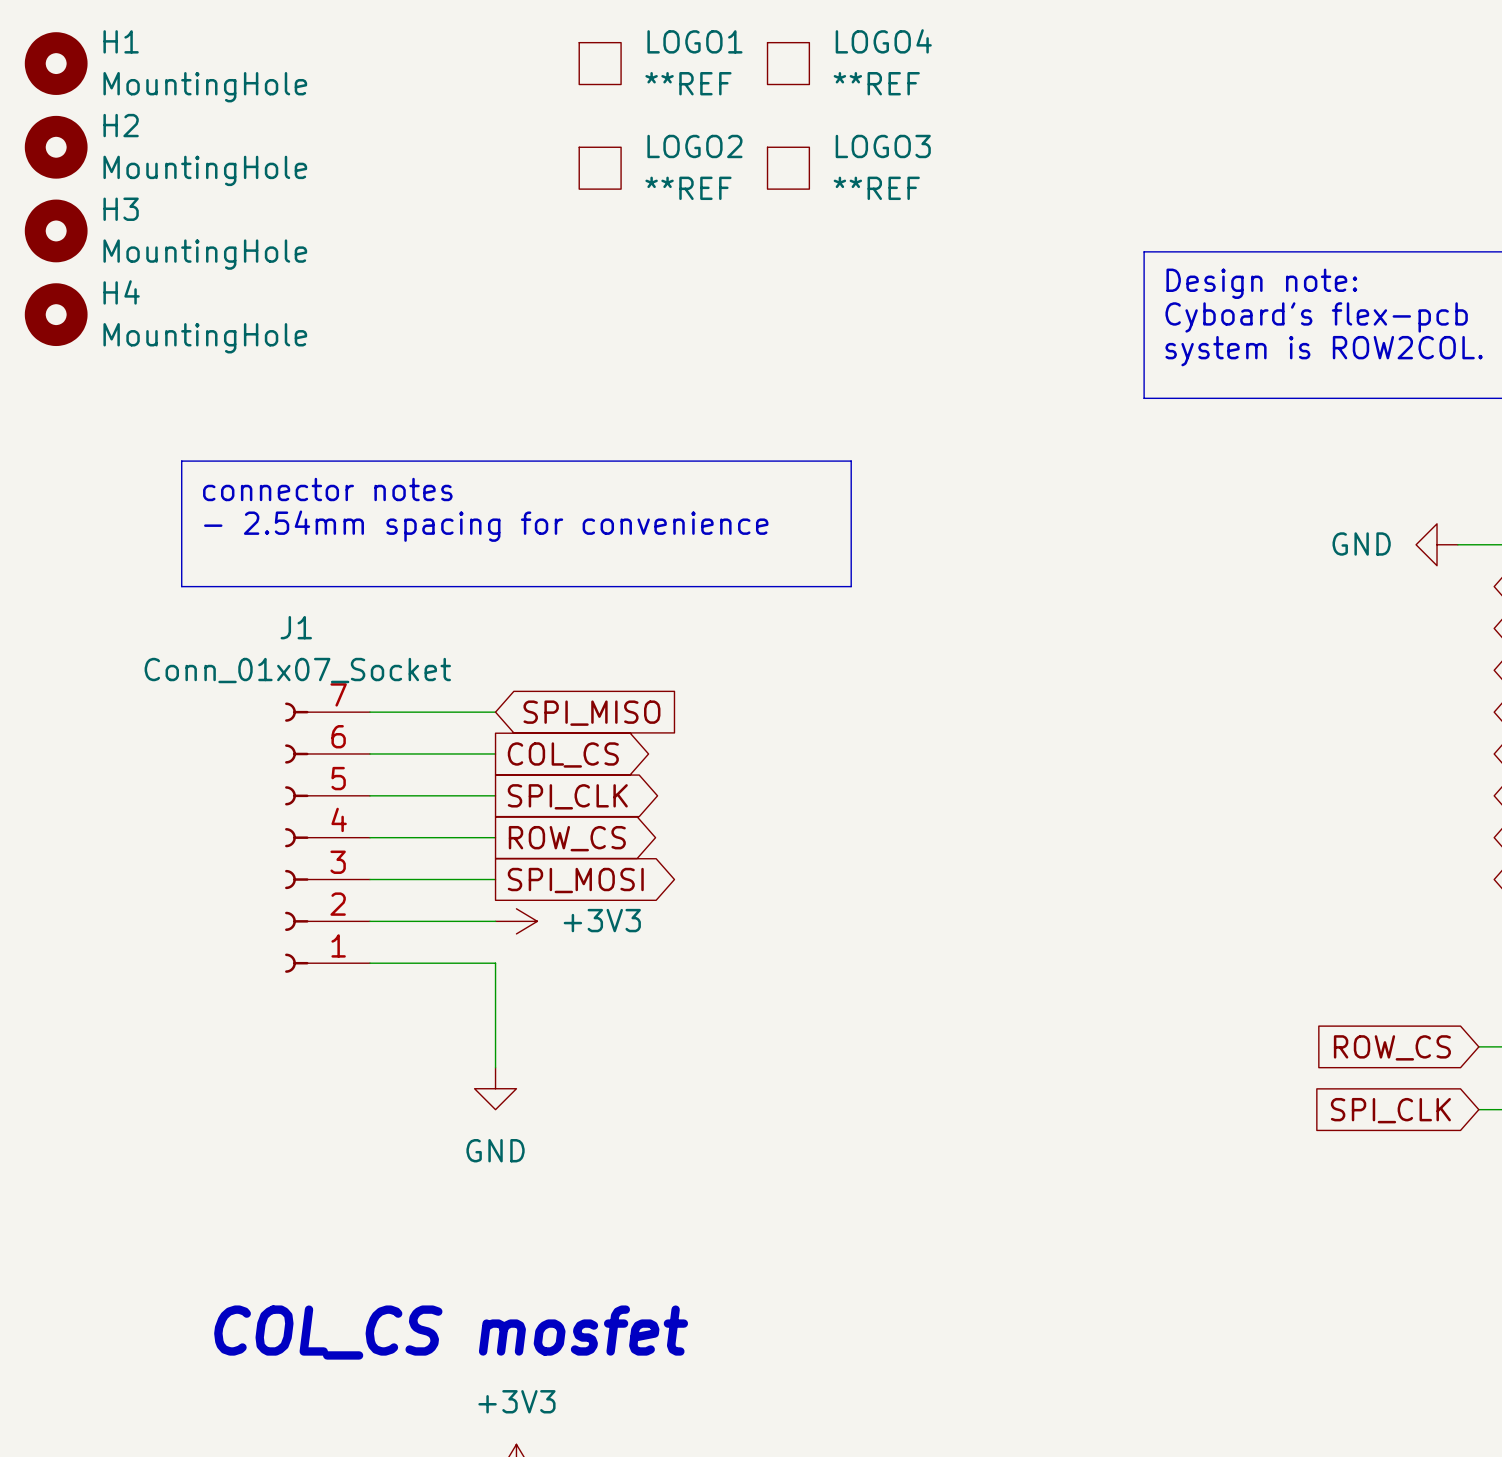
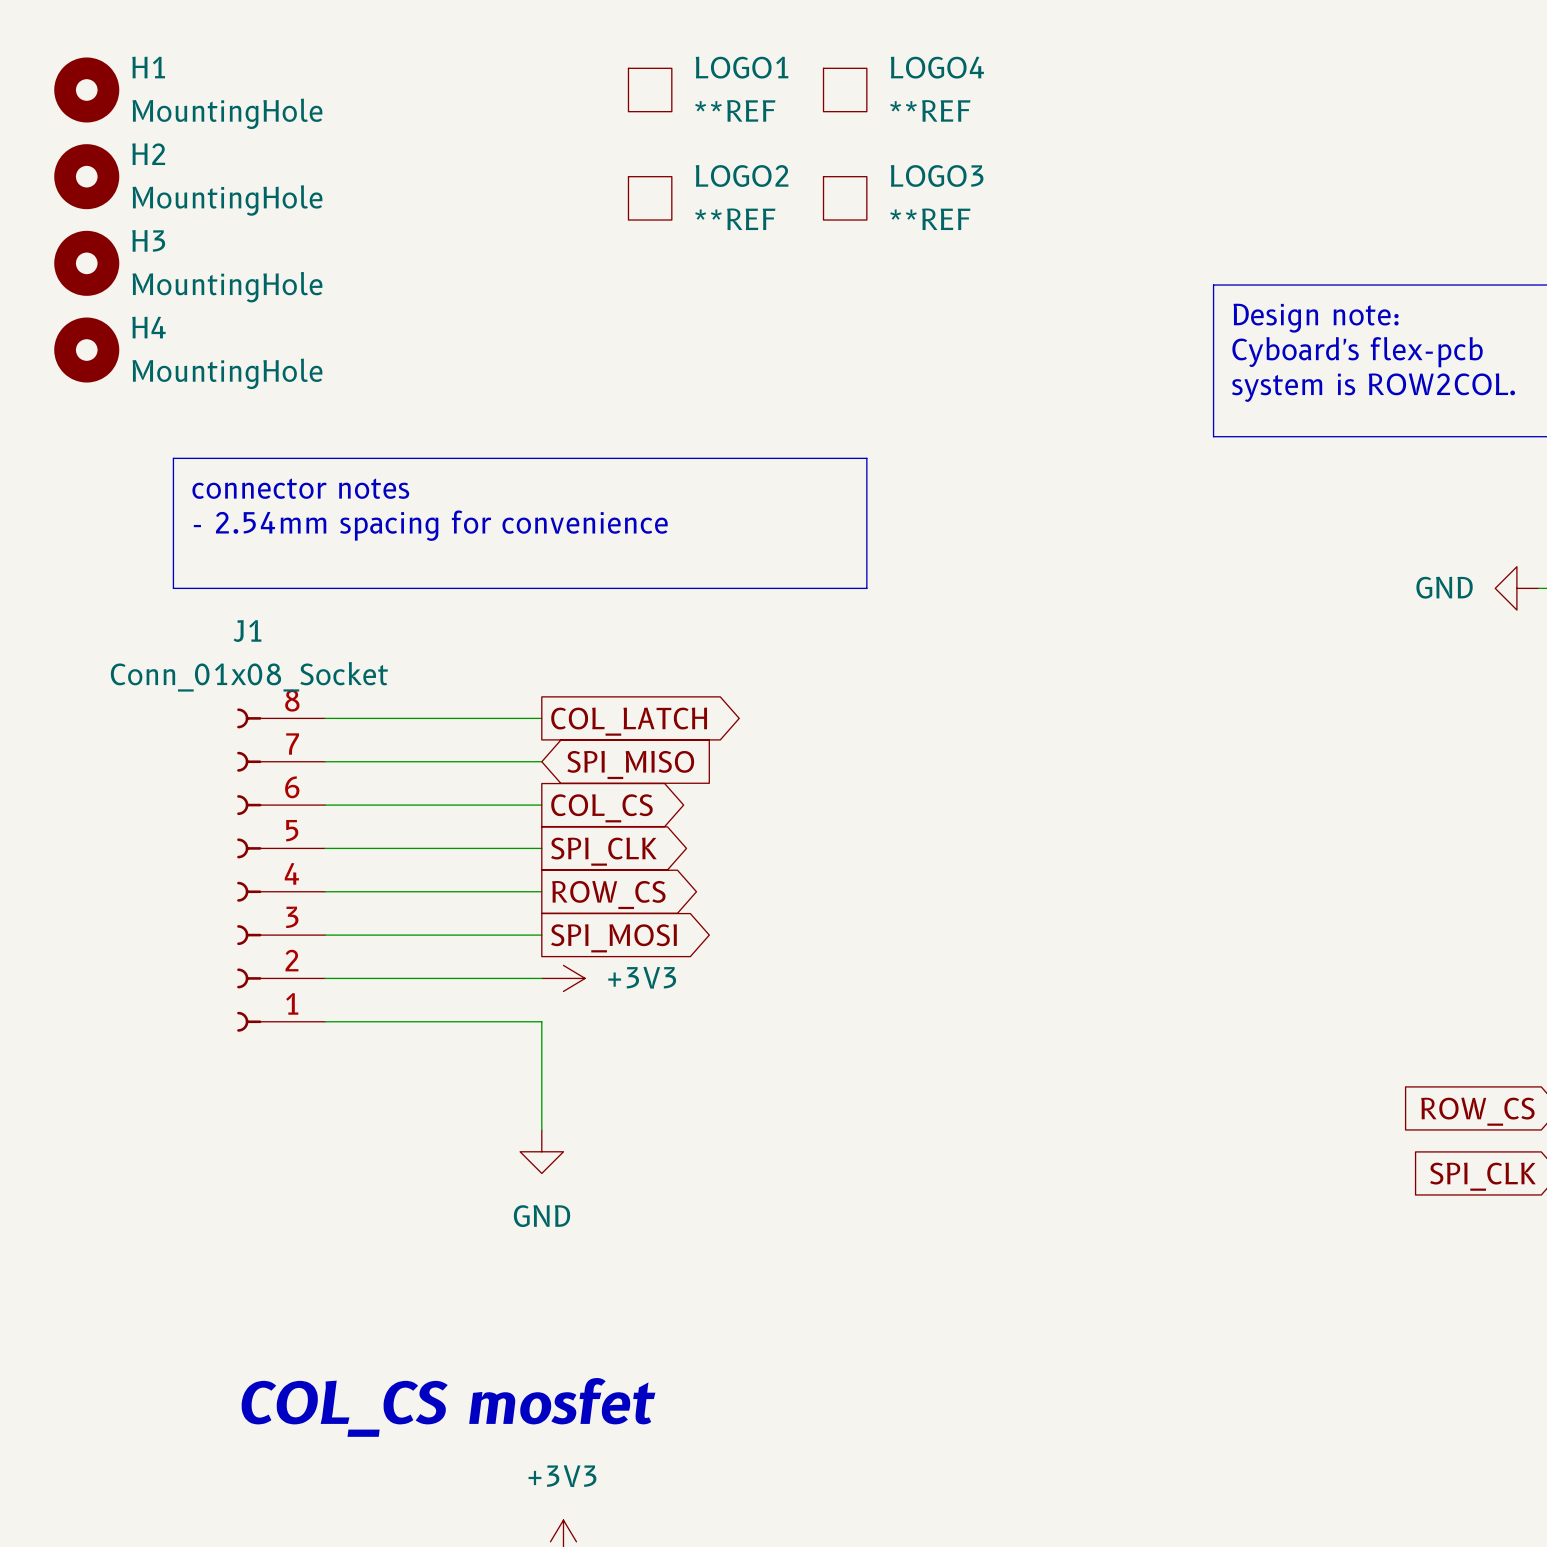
line: (181, 461) (851, 461) (851, 586) (181, 586) (181, 461) -> (173, 458) (866, 458) (866, 588) (173, 588) (173, 458)
text position: connector notes (327, 489) -> connector notes (300, 488)
text position: - 2.54mm spacing for convenience (486, 526) -> - 2.54mm spacing for convenience (430, 525)
wire: none -> (325, 718) (541, 718)
J1 value: Conn_01x07_Socket (297, 670) -> Conn_01x08_Socket (249, 676)
global label: none -> COL_LATCH (629, 721)
J1 symbol: [285, 702, 371, 973] -> [237, 708, 326, 1032]

